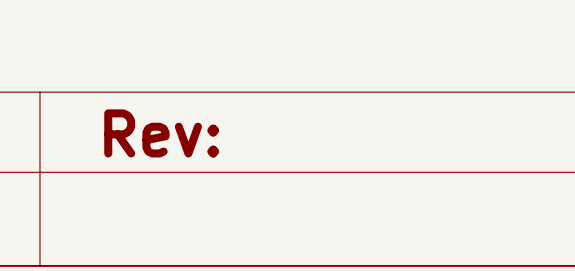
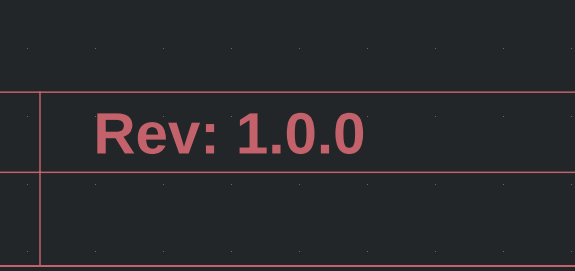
title block: Rev: (161, 133) -> Rev: 1.0.0 (230, 133)

